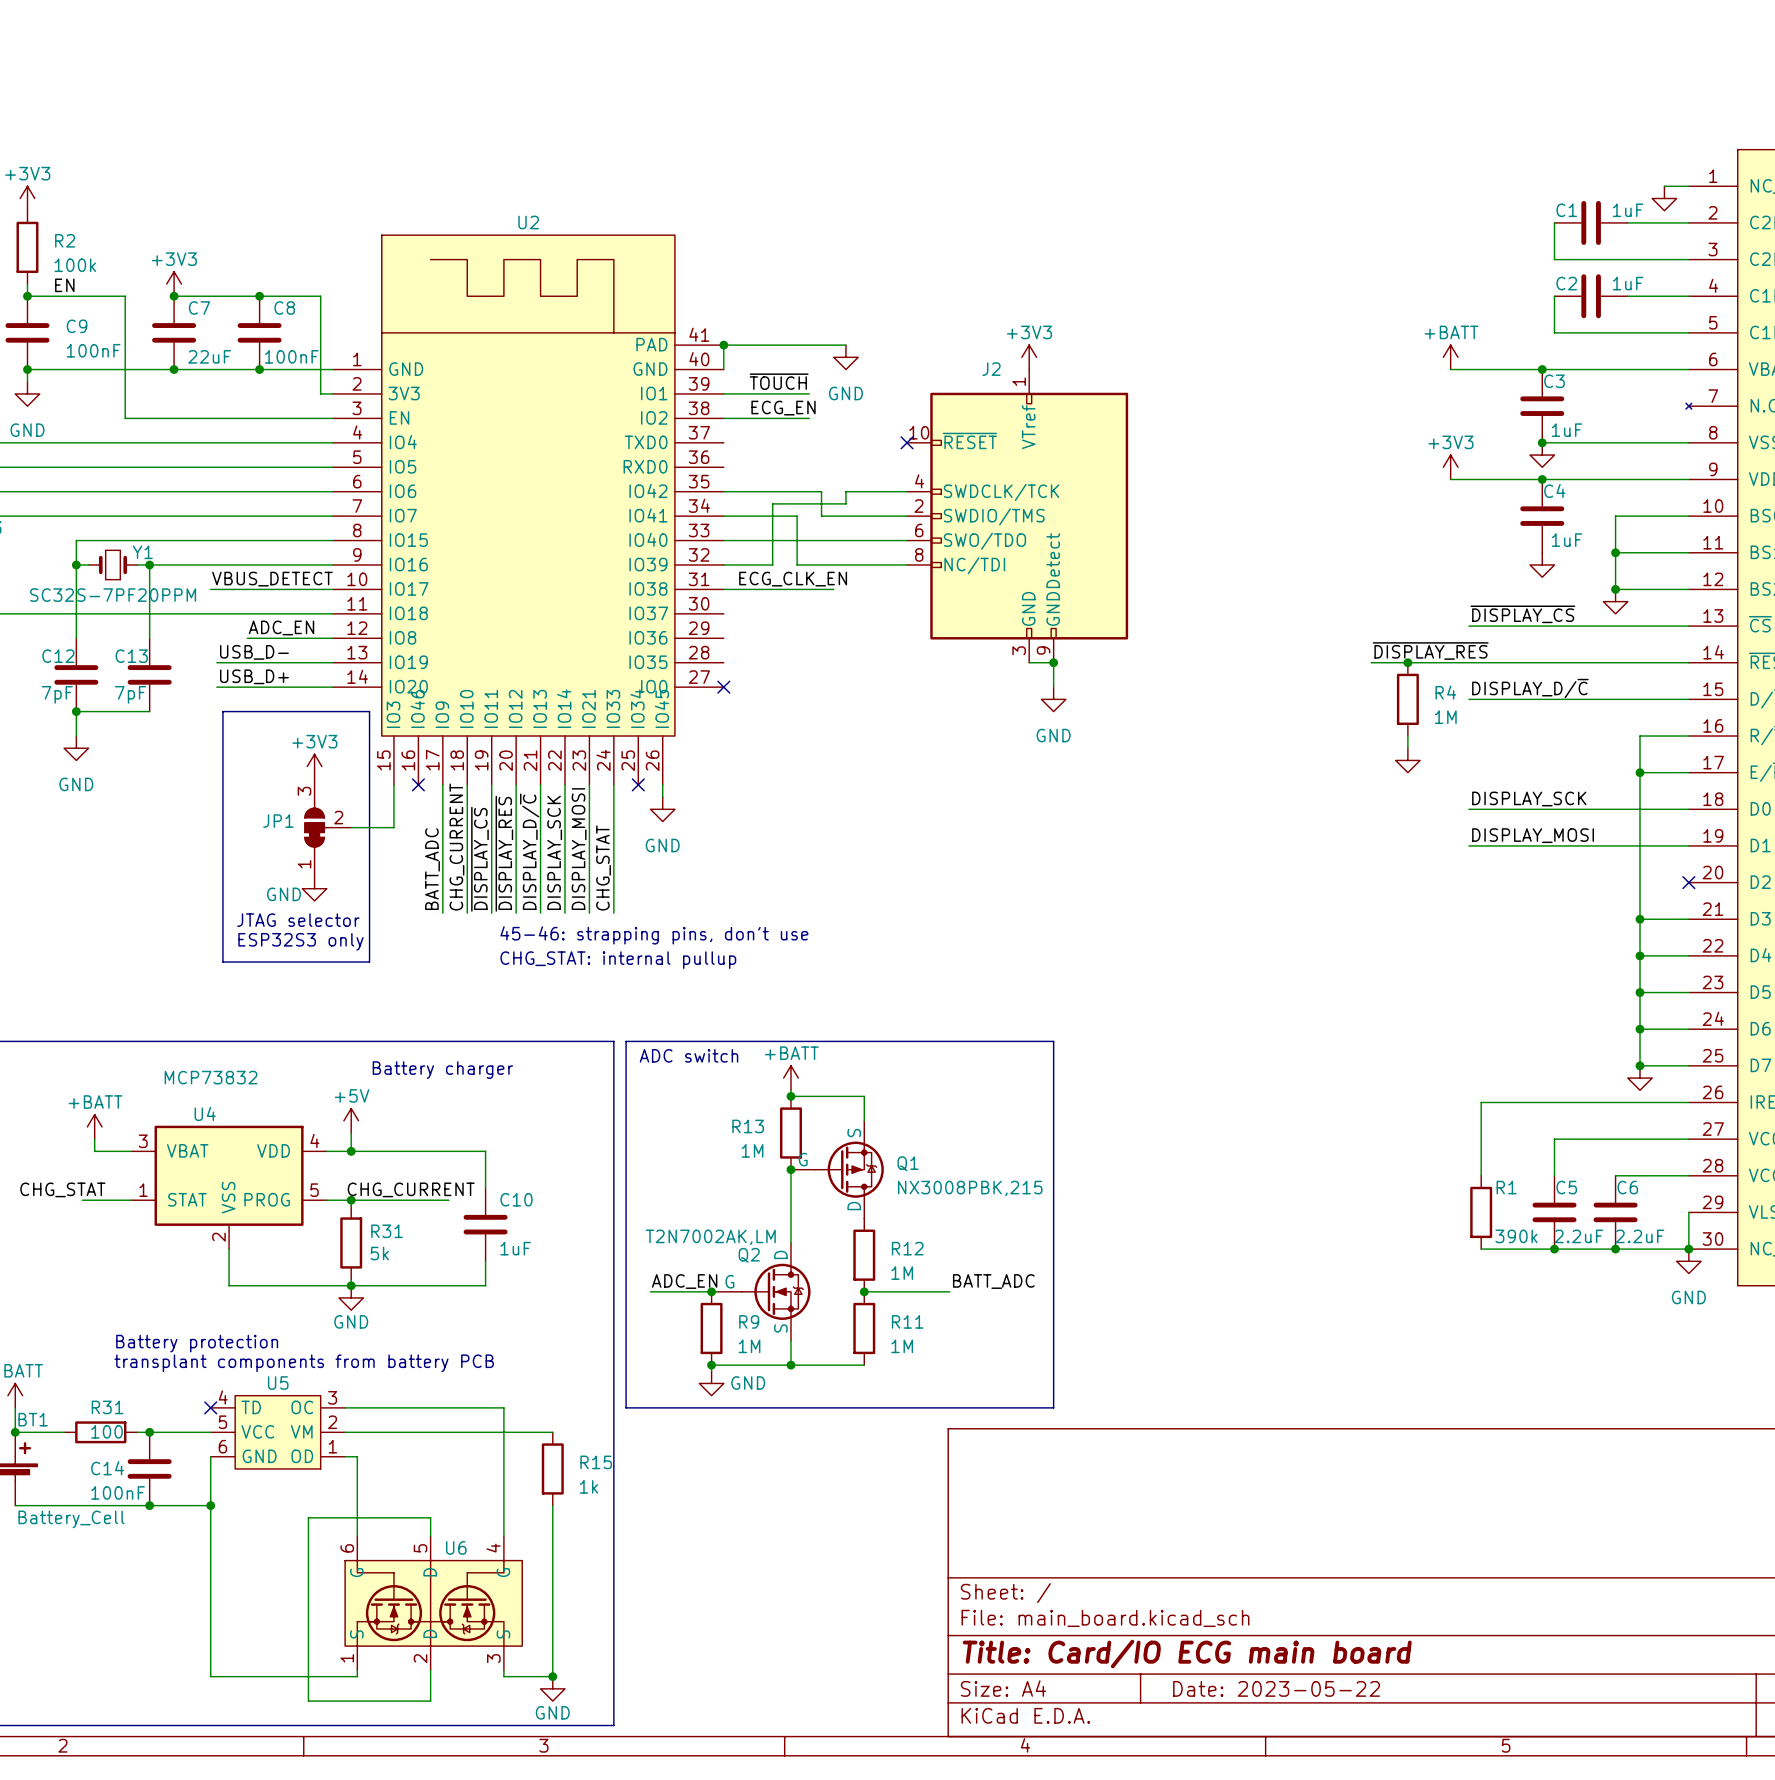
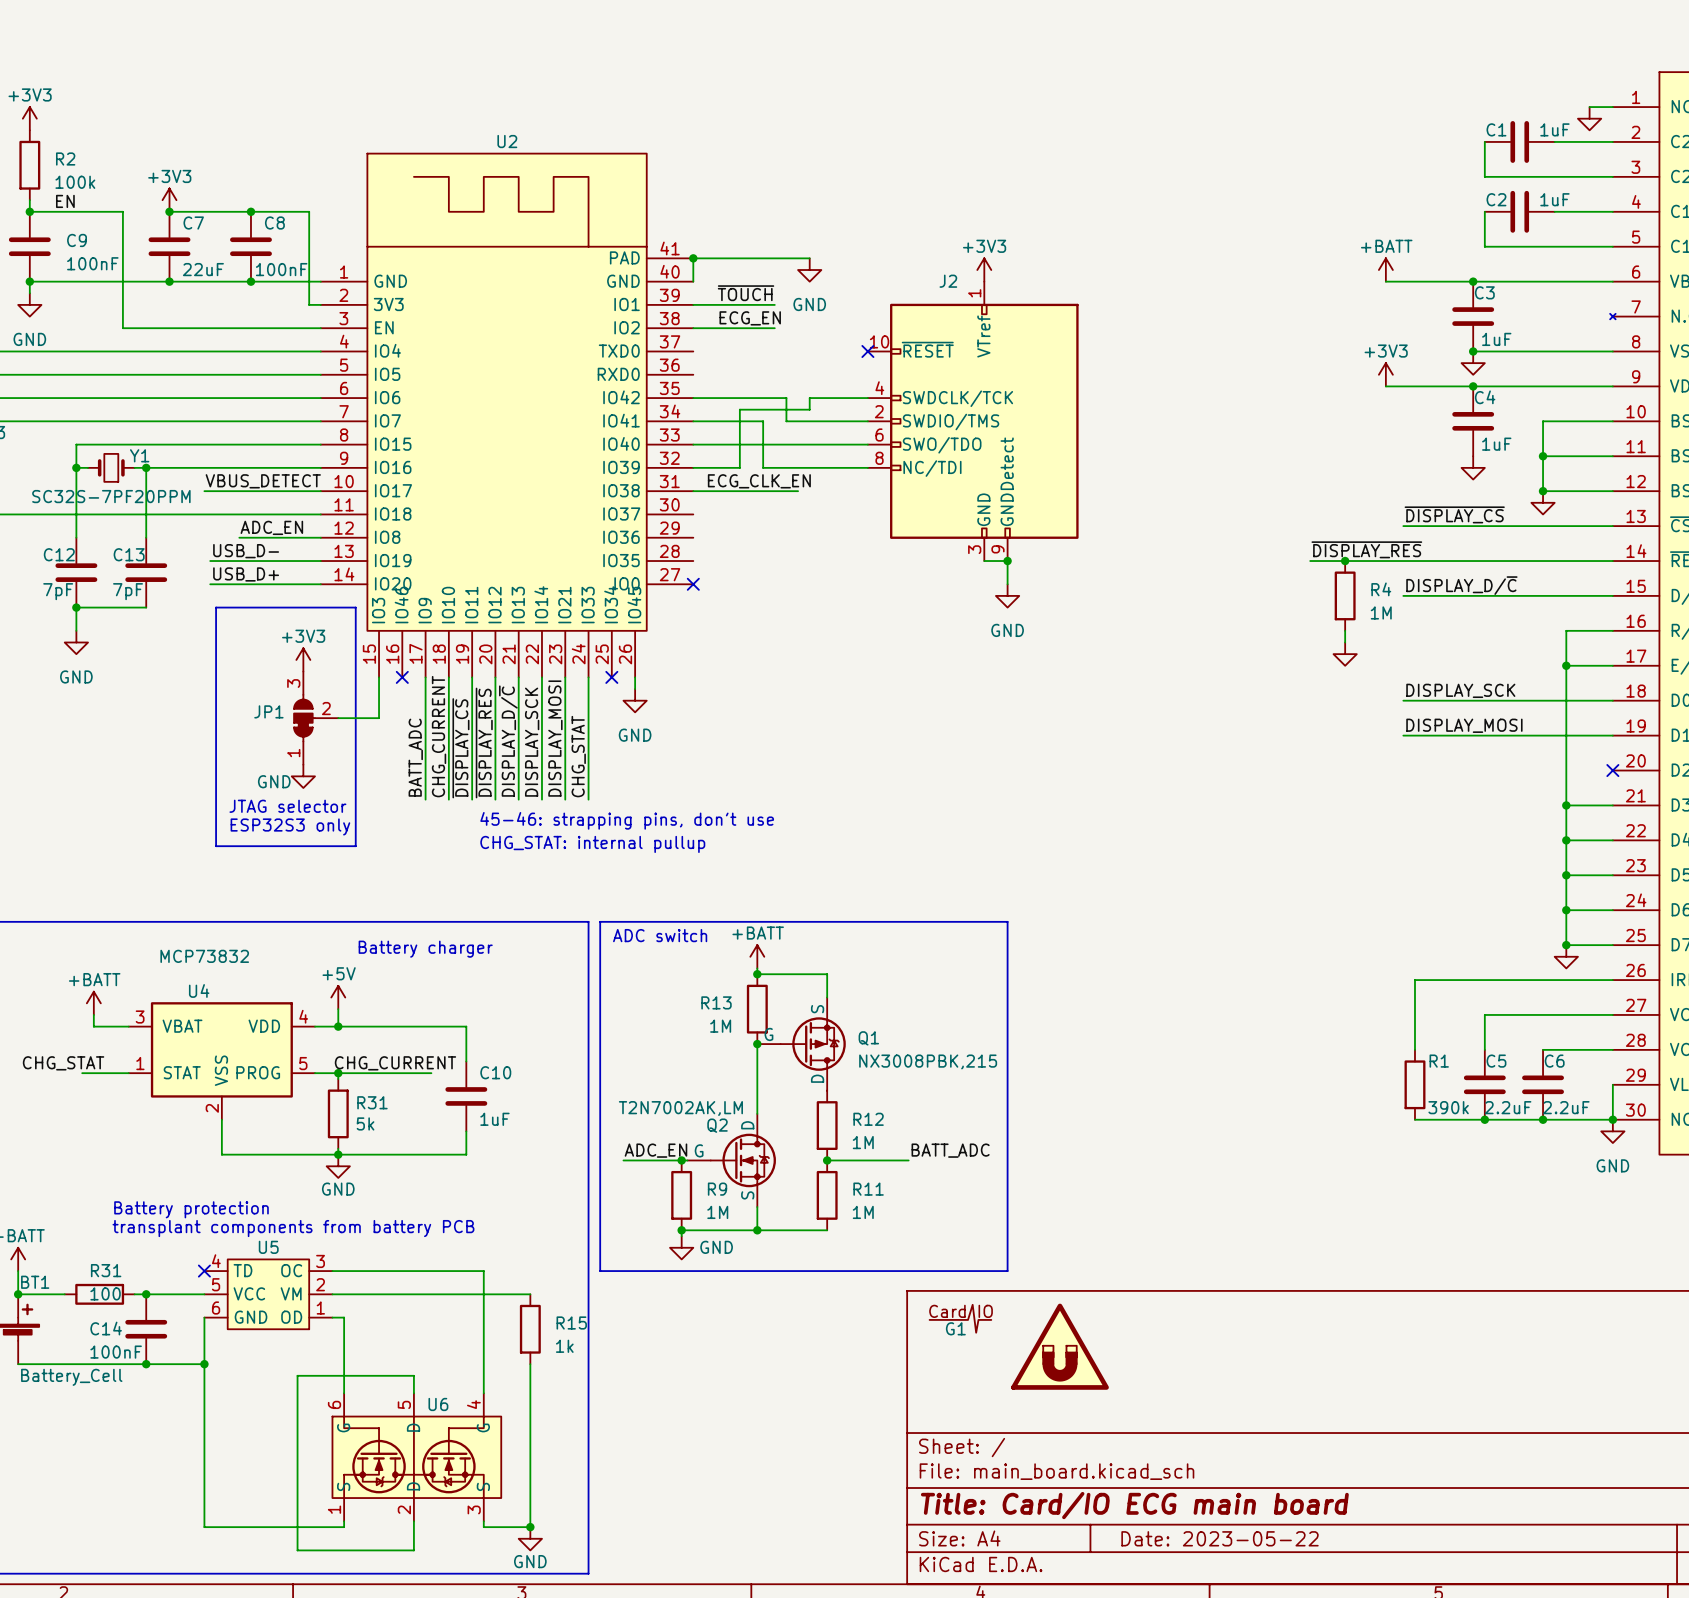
G1: none -> (960, 1318)
part: none -> (1059, 1346)

